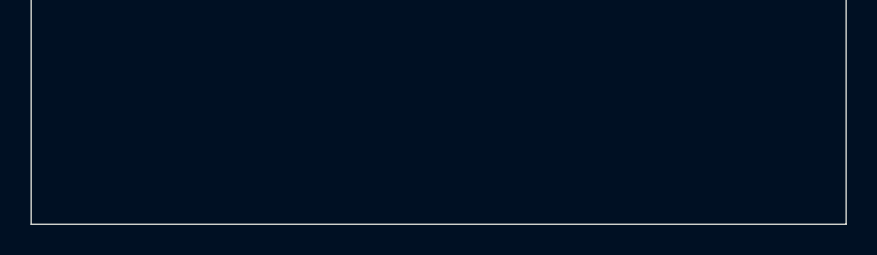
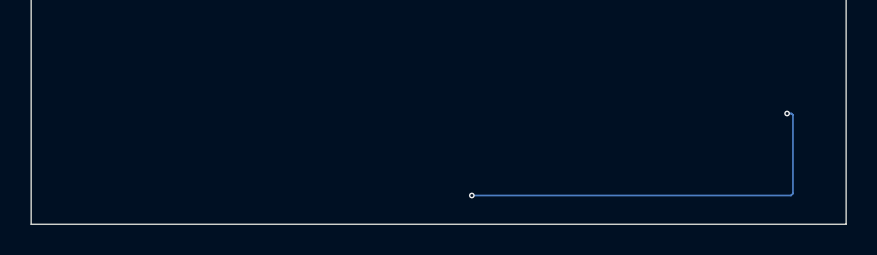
track: none -> (787, 113) (792, 114) (792, 193) (791, 195) (471, 195)
via: none -> (787, 113)
via: none -> (471, 195)

